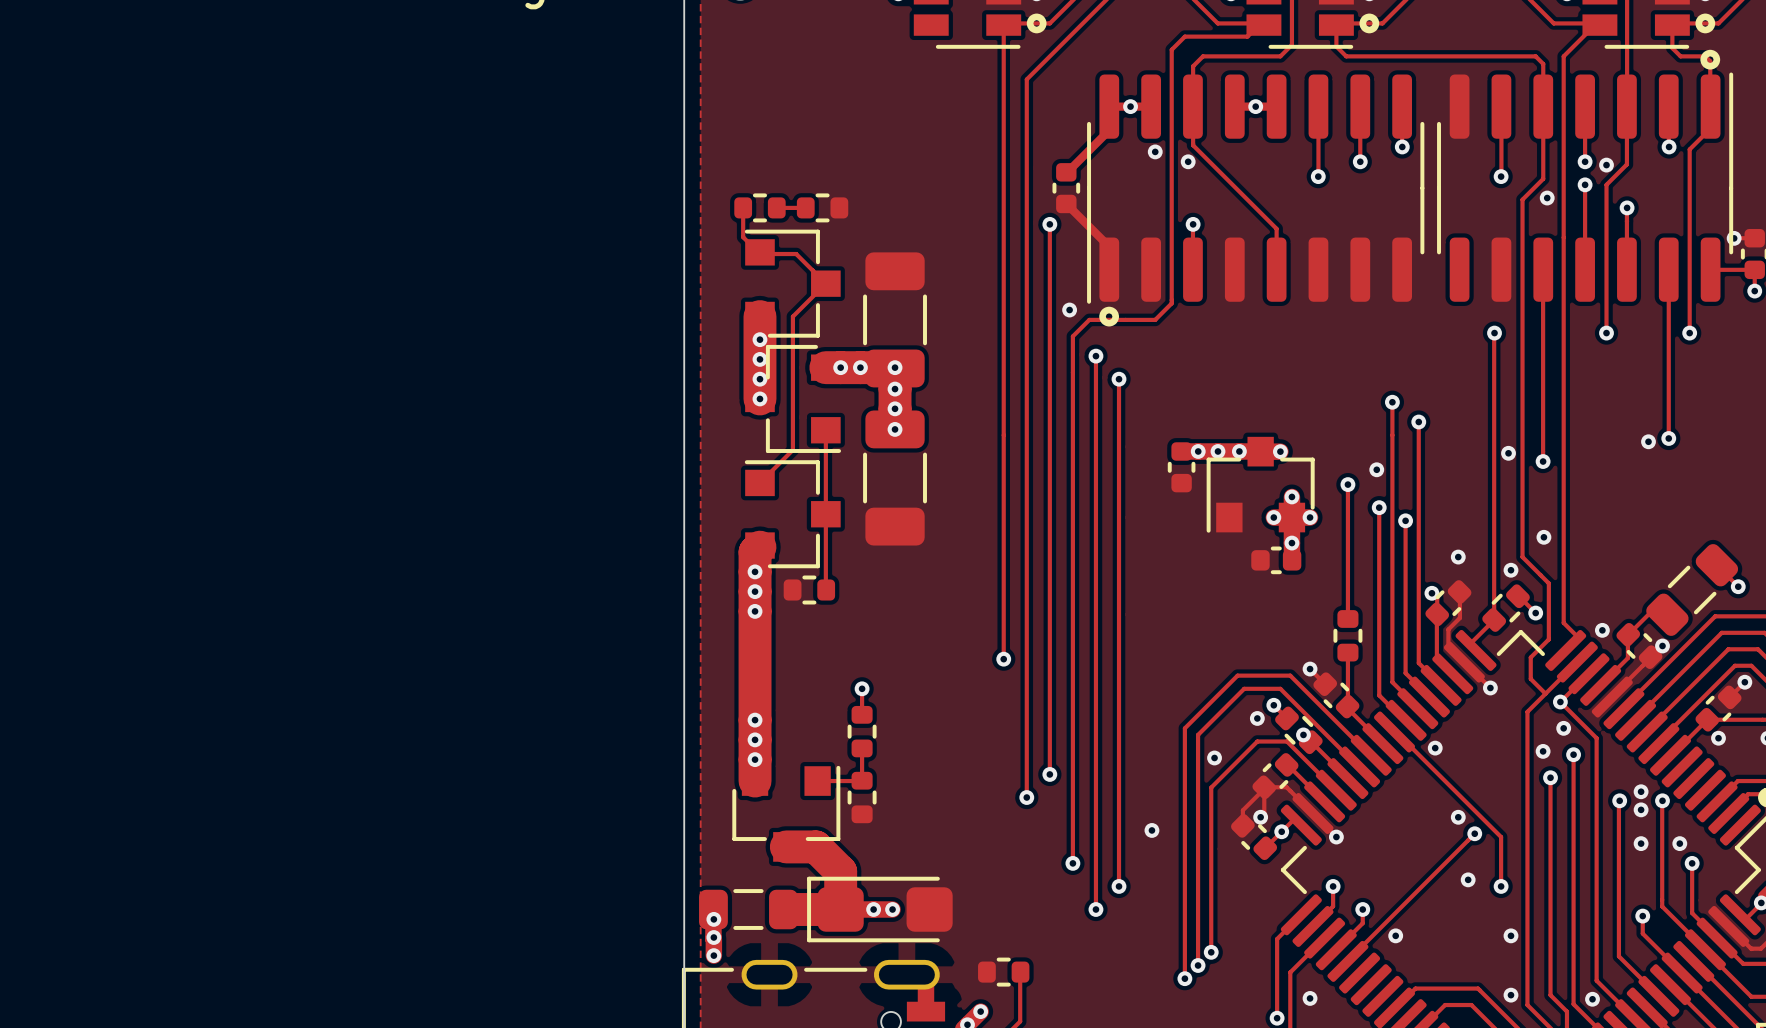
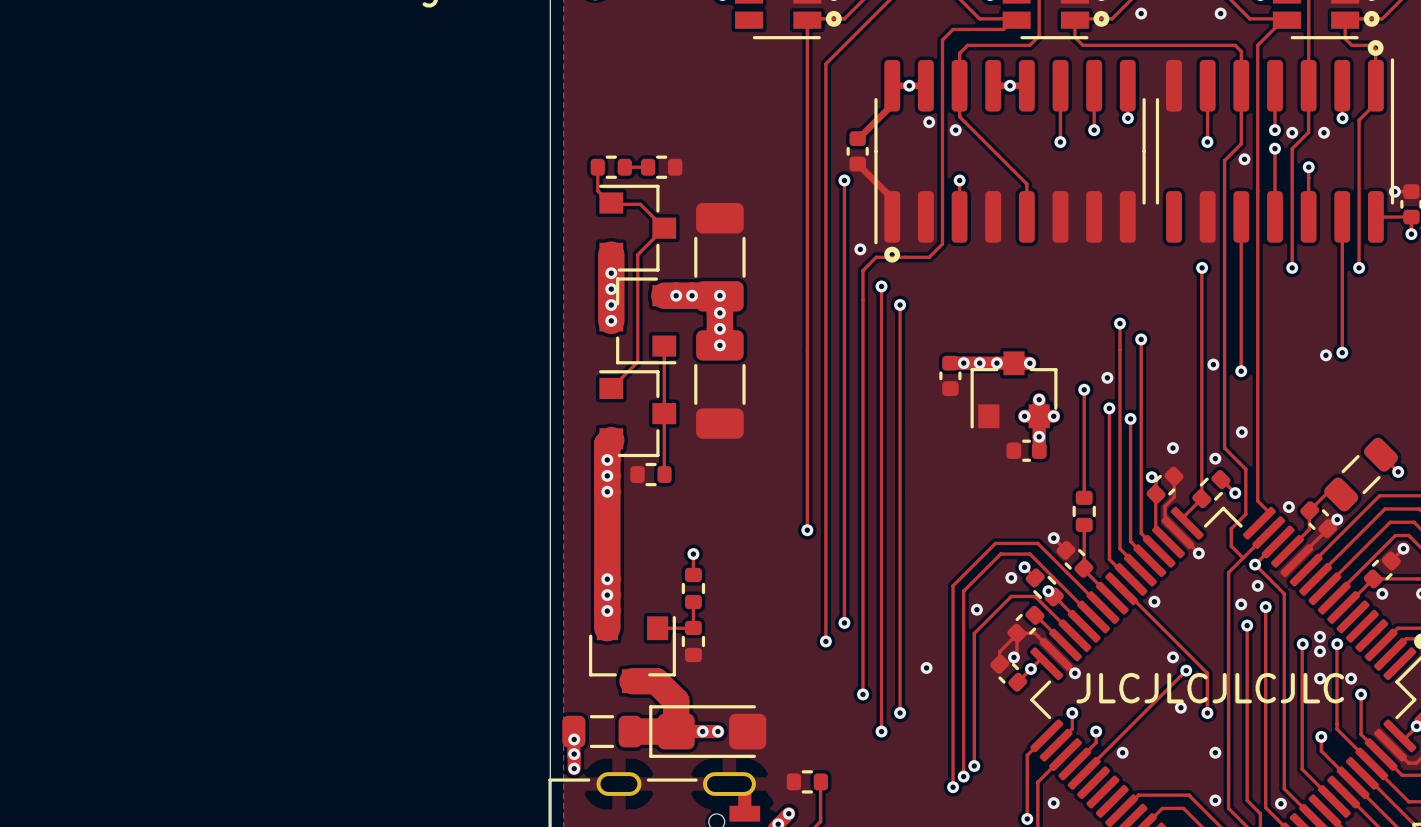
via: none -> (1141, 13)
via: none -> (1220, 13)
via: none -> (1323, 132)
text: none -> JLCJLCJLCJLC (1210, 688)

